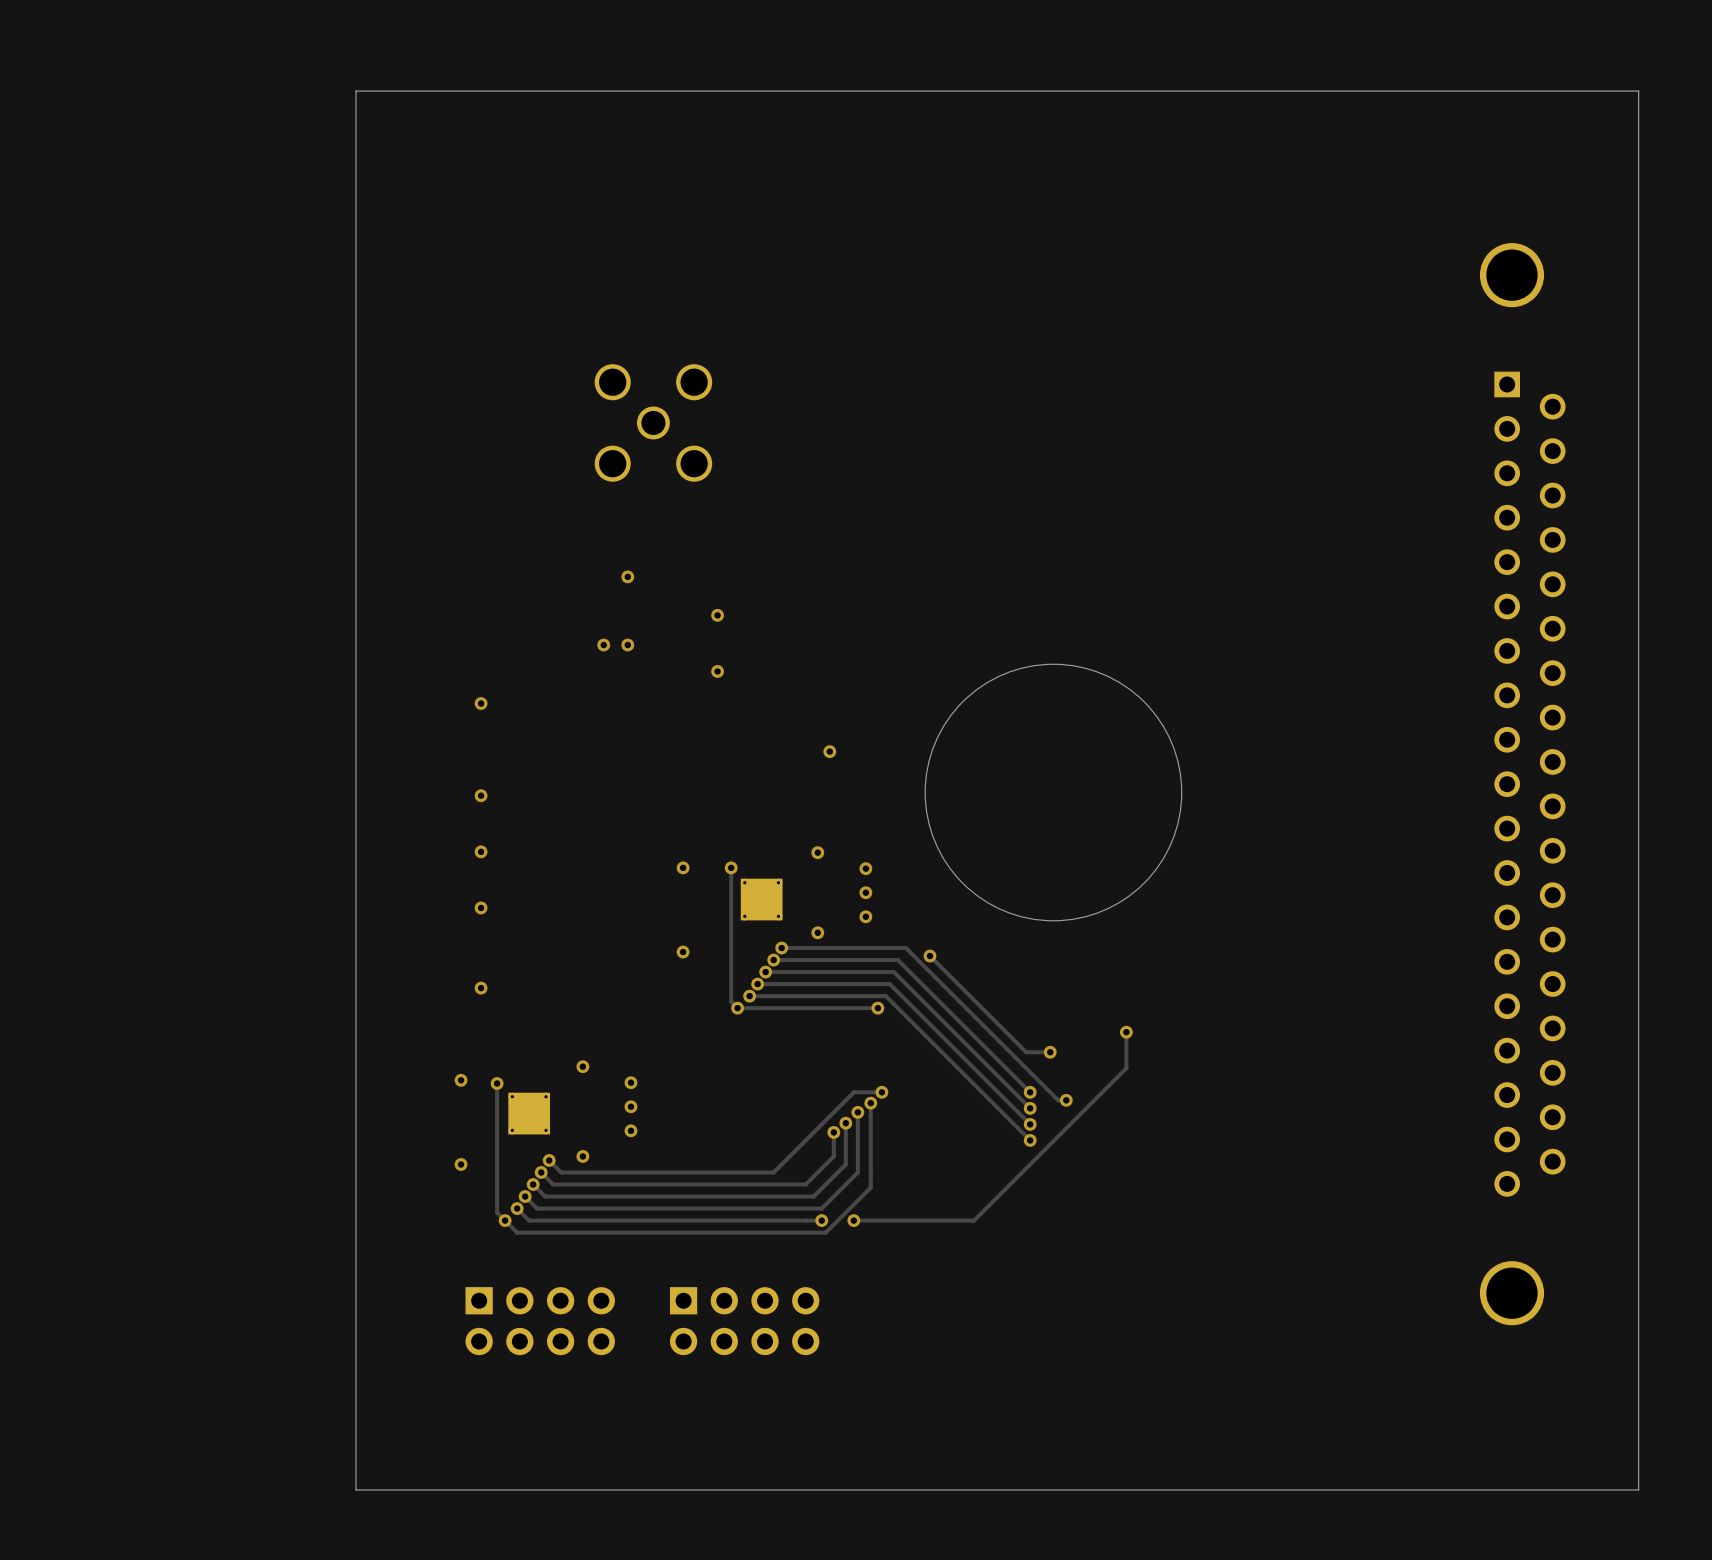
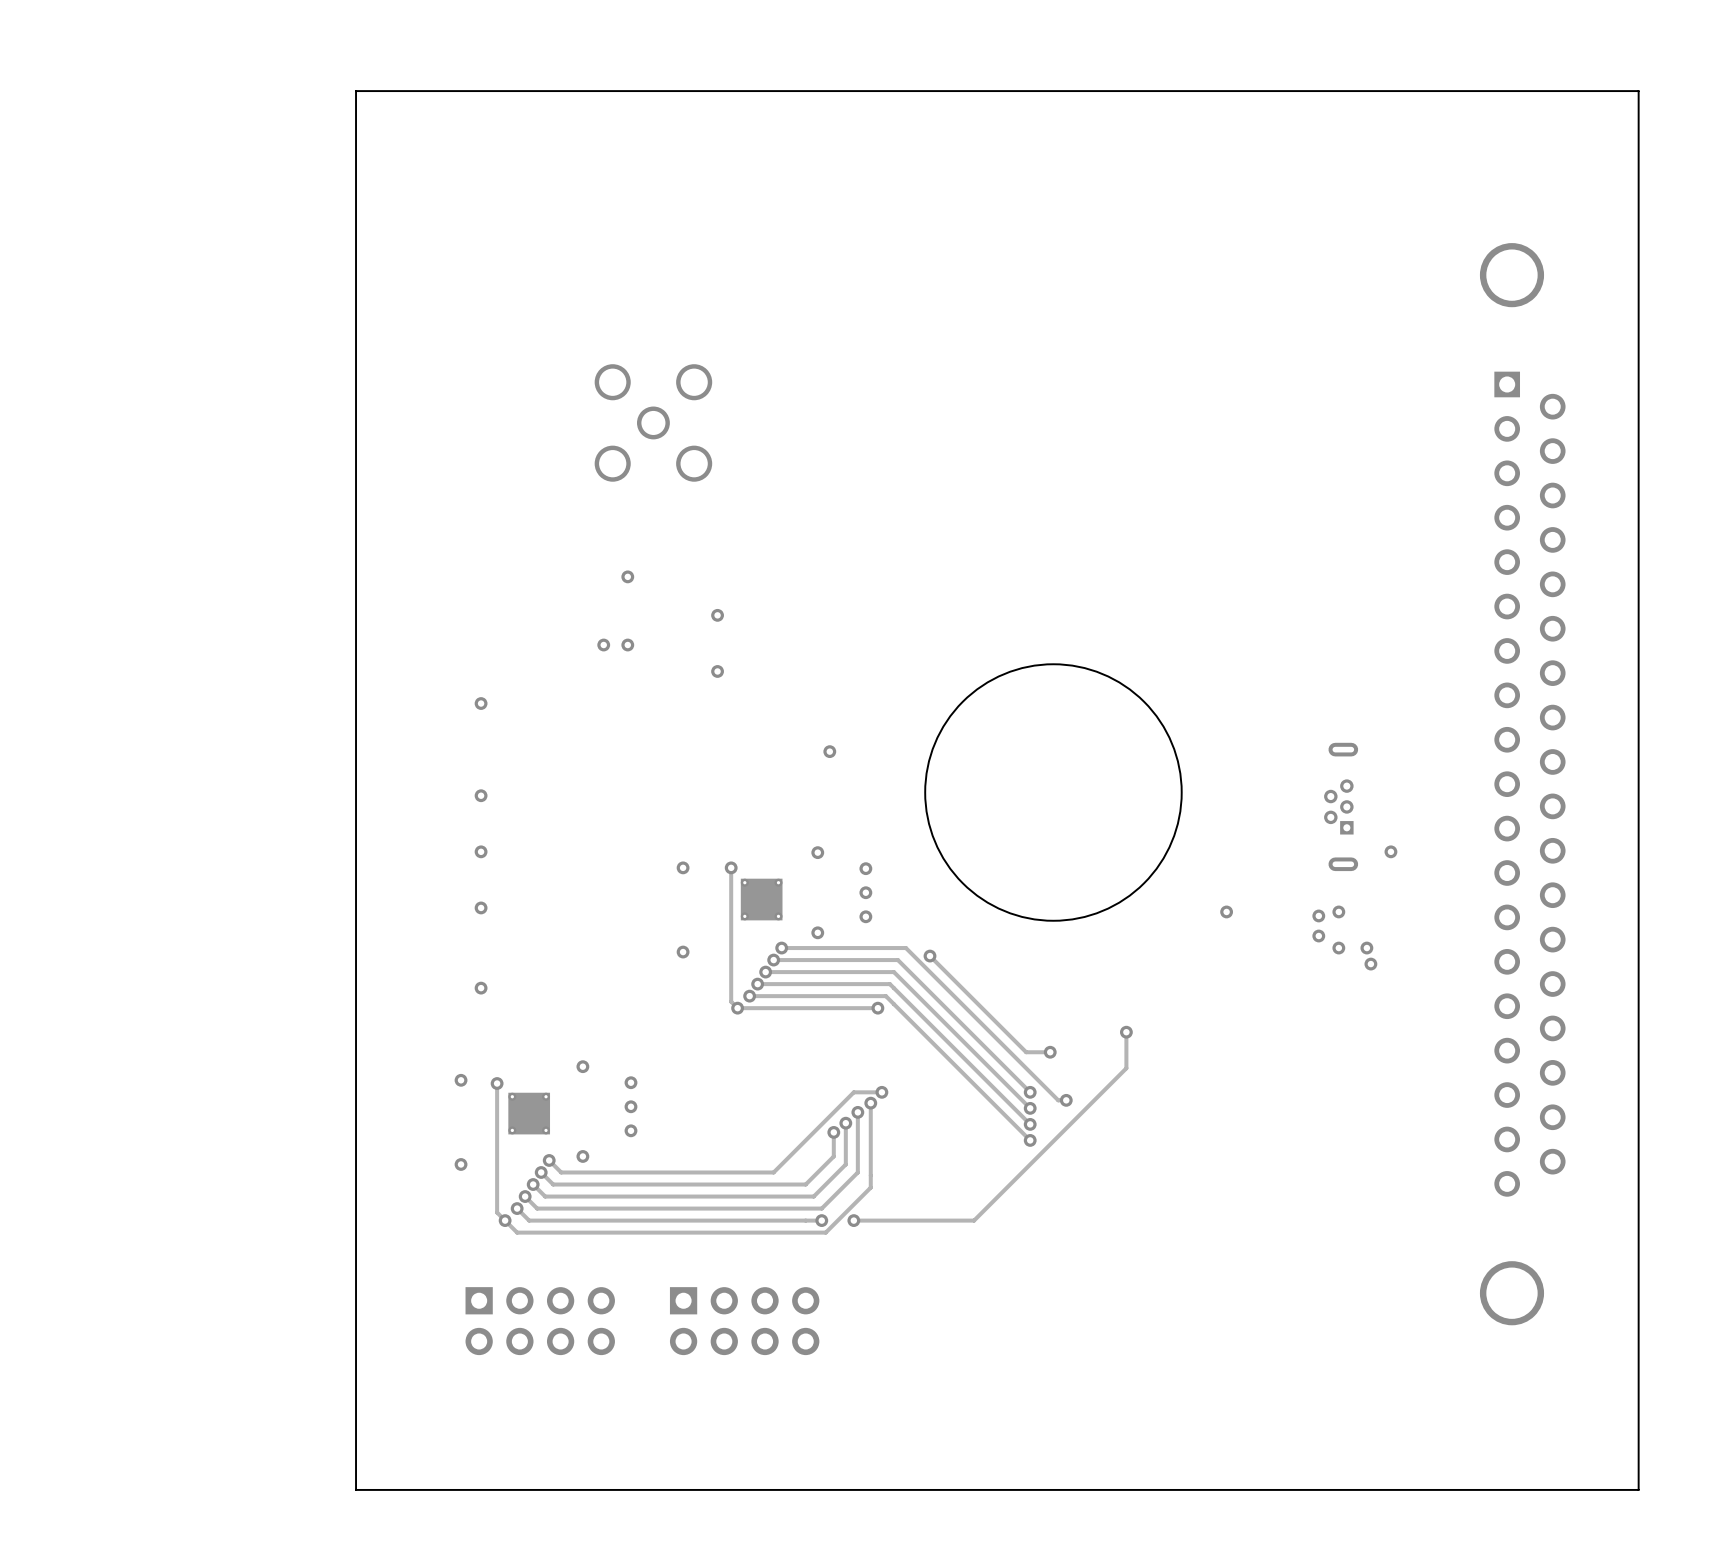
part: none -> (1341, 806)
via: none -> (1390, 851)
via: none -> (1226, 911)
via: none -> (1338, 911)
via: none -> (1318, 915)
via: none -> (1318, 936)
via: none -> (1338, 948)
via: none -> (1366, 948)
via: none -> (1370, 964)

